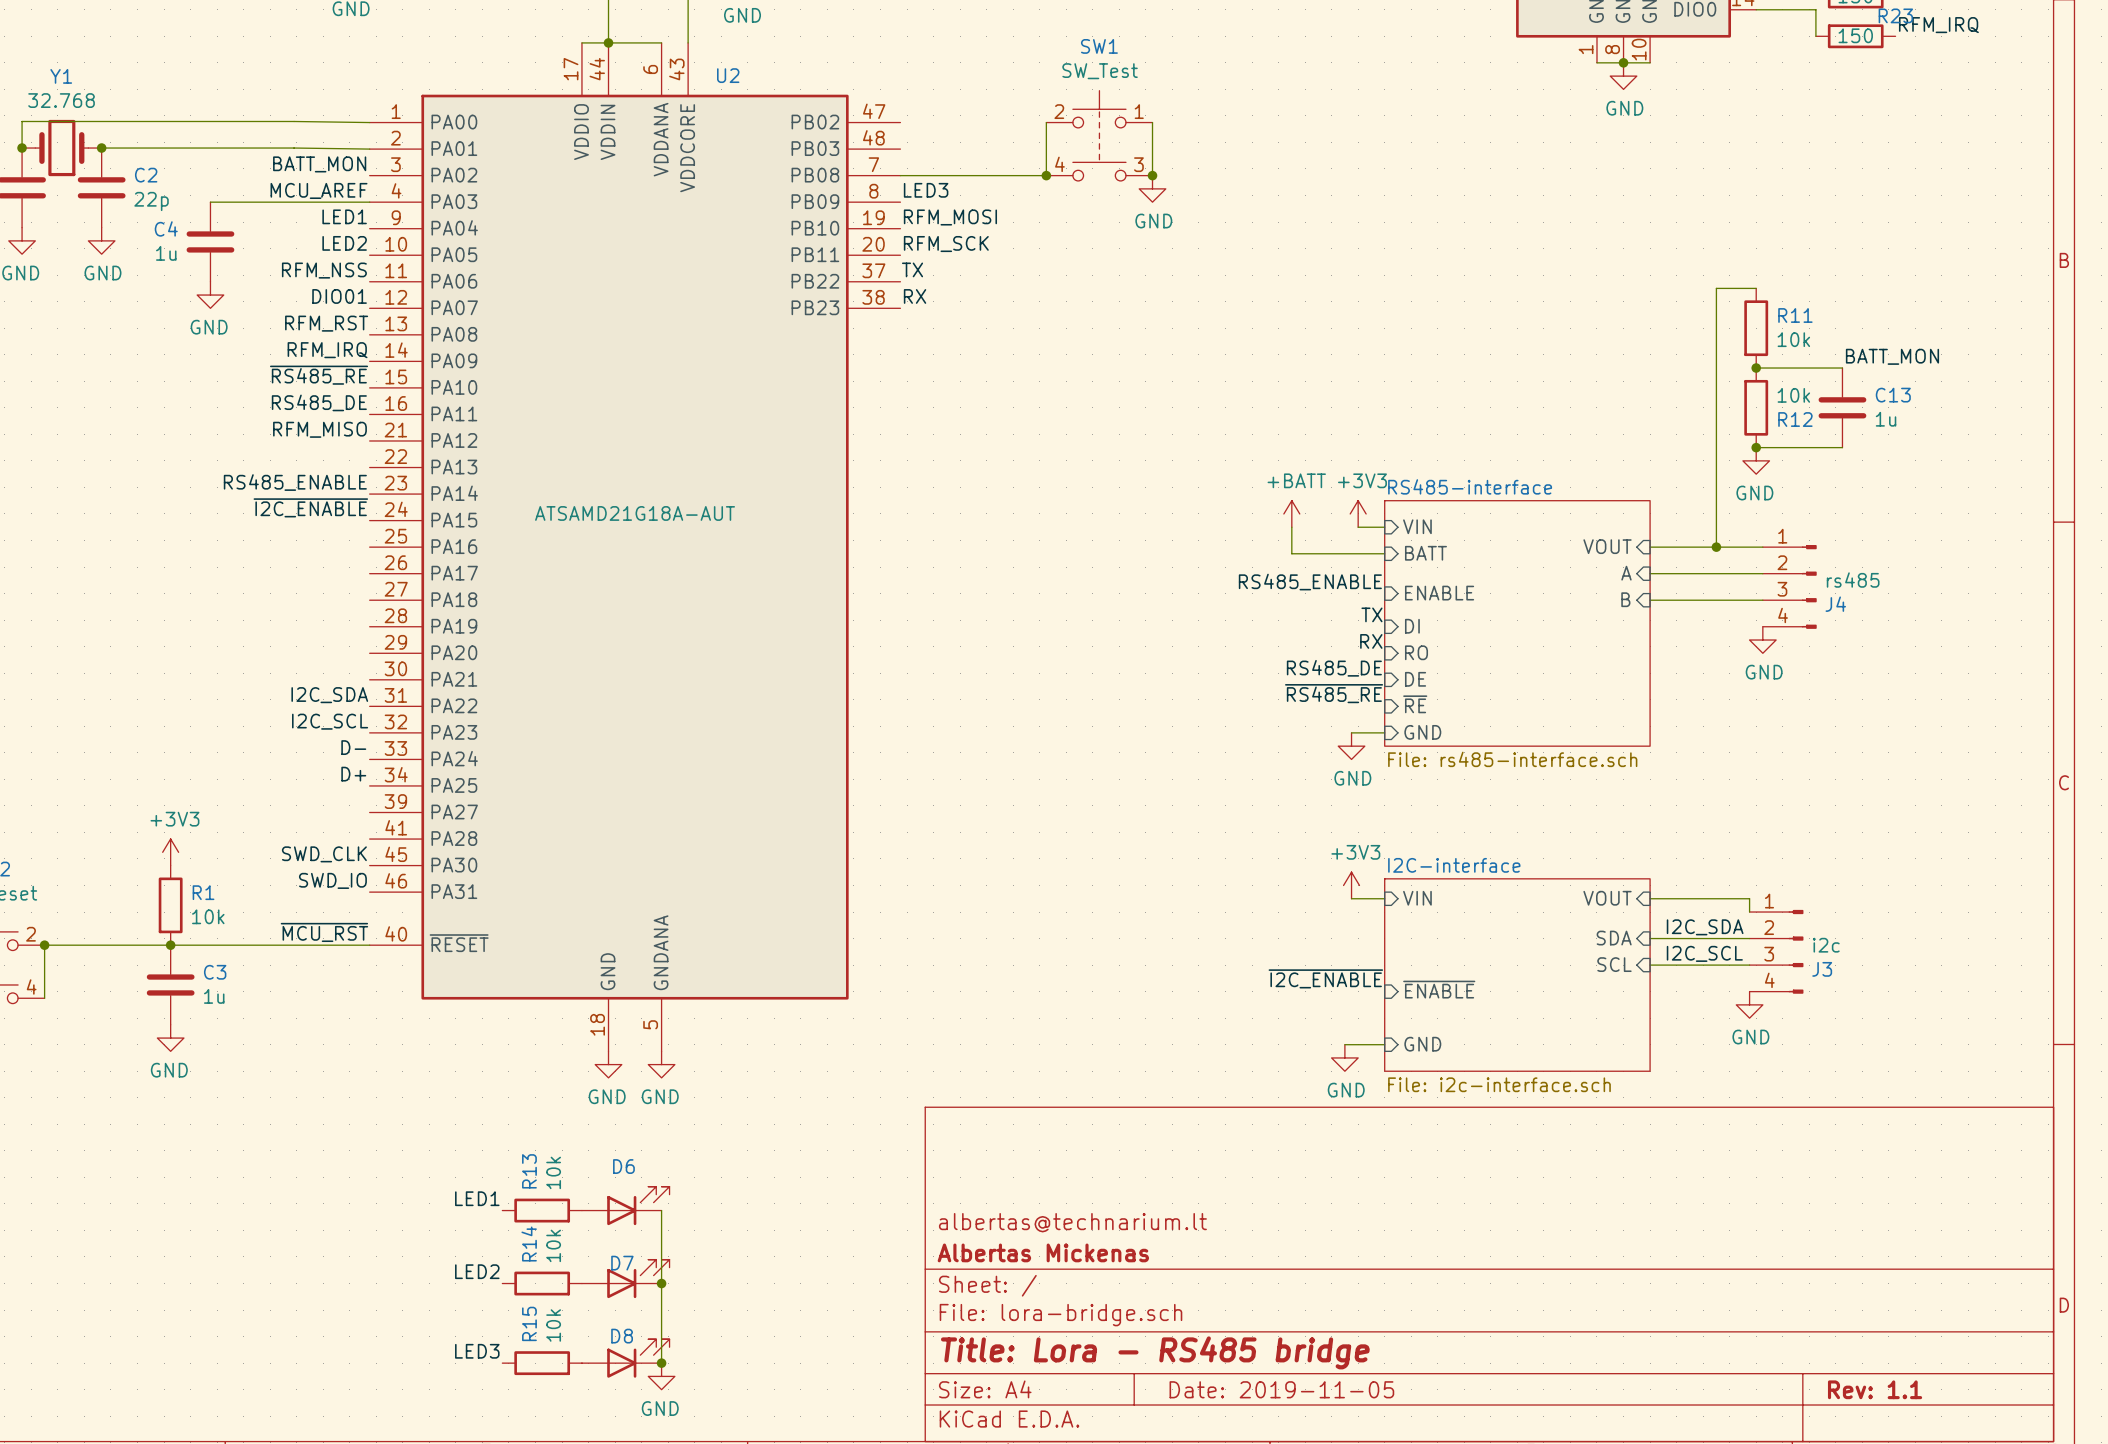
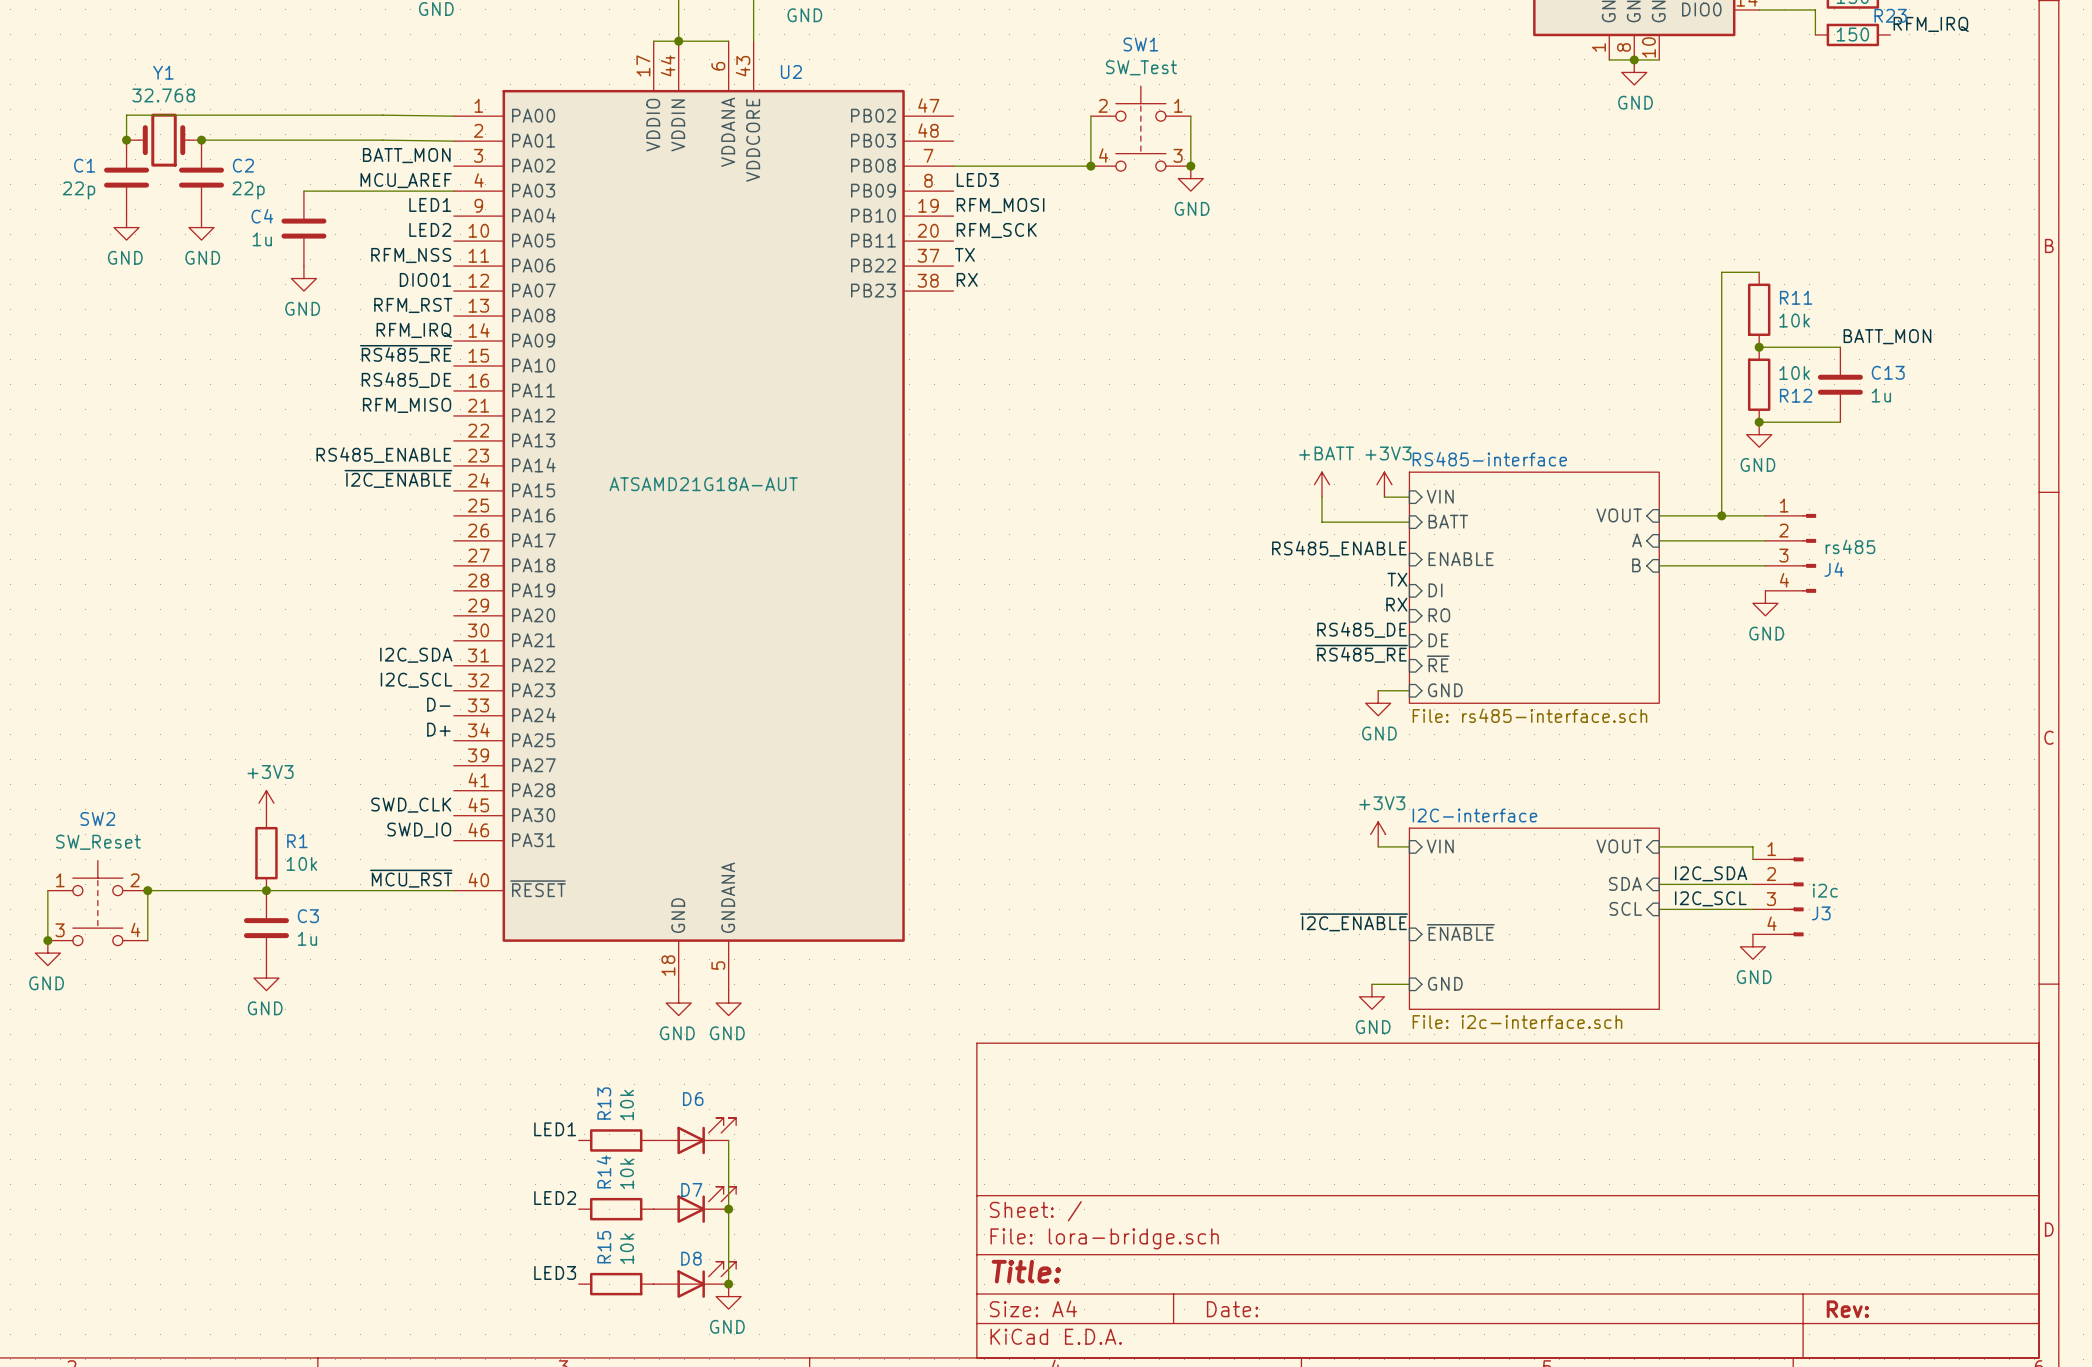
title block: albertas@technarium.lt (1072, 1222) -> none
title block: Albertas Mickenas (1043, 1252) -> none
title block: Title: Lora - RS485 bridge (1155, 1352) -> Title: (1026, 1271)
title block: Date: 2019-11-05 (1281, 1389) -> Date: (1232, 1309)
title block: Rev: 1.1 (1875, 1389) -> Rev: (1847, 1309)

